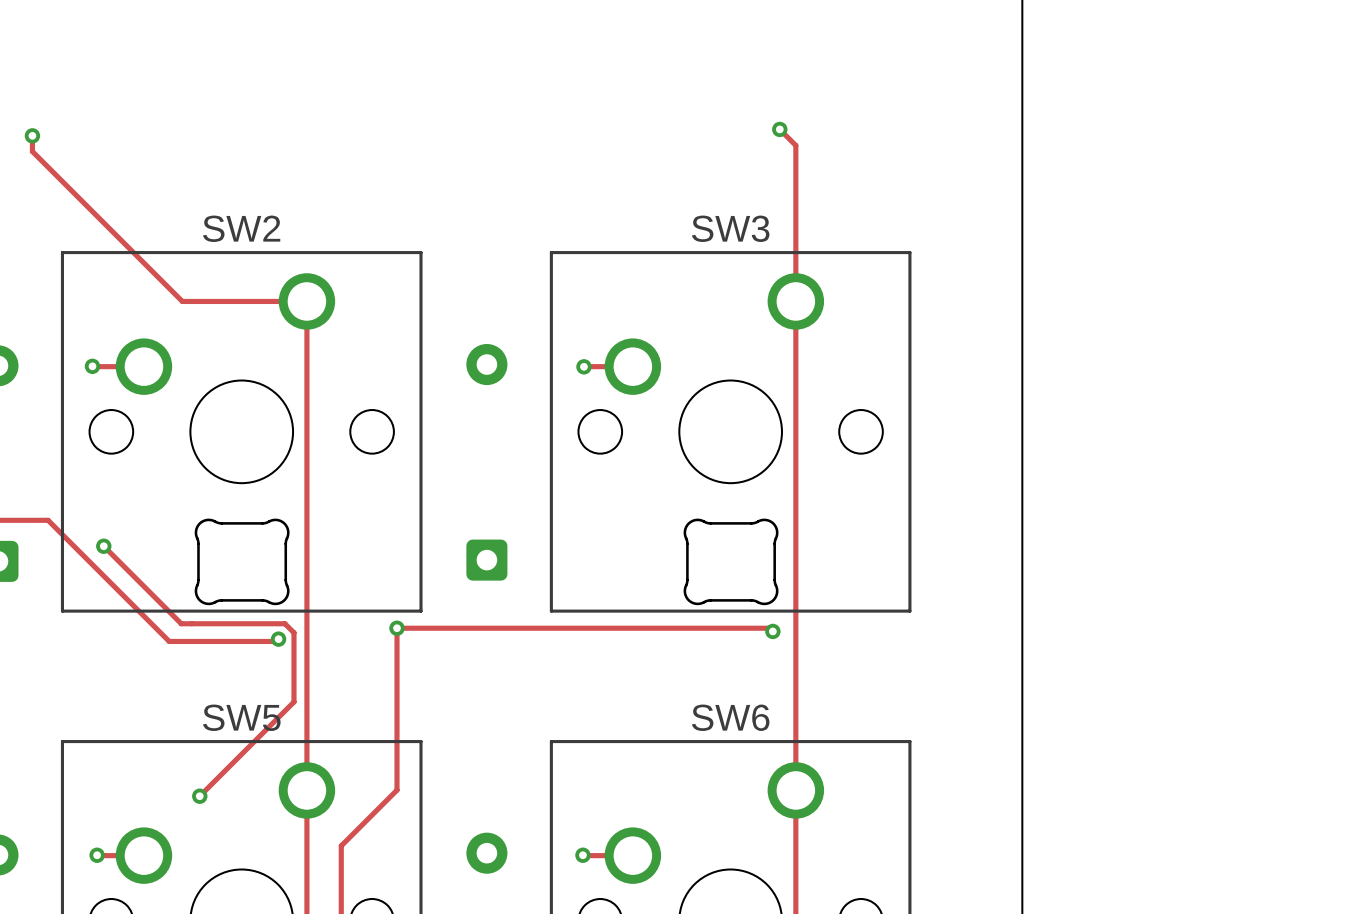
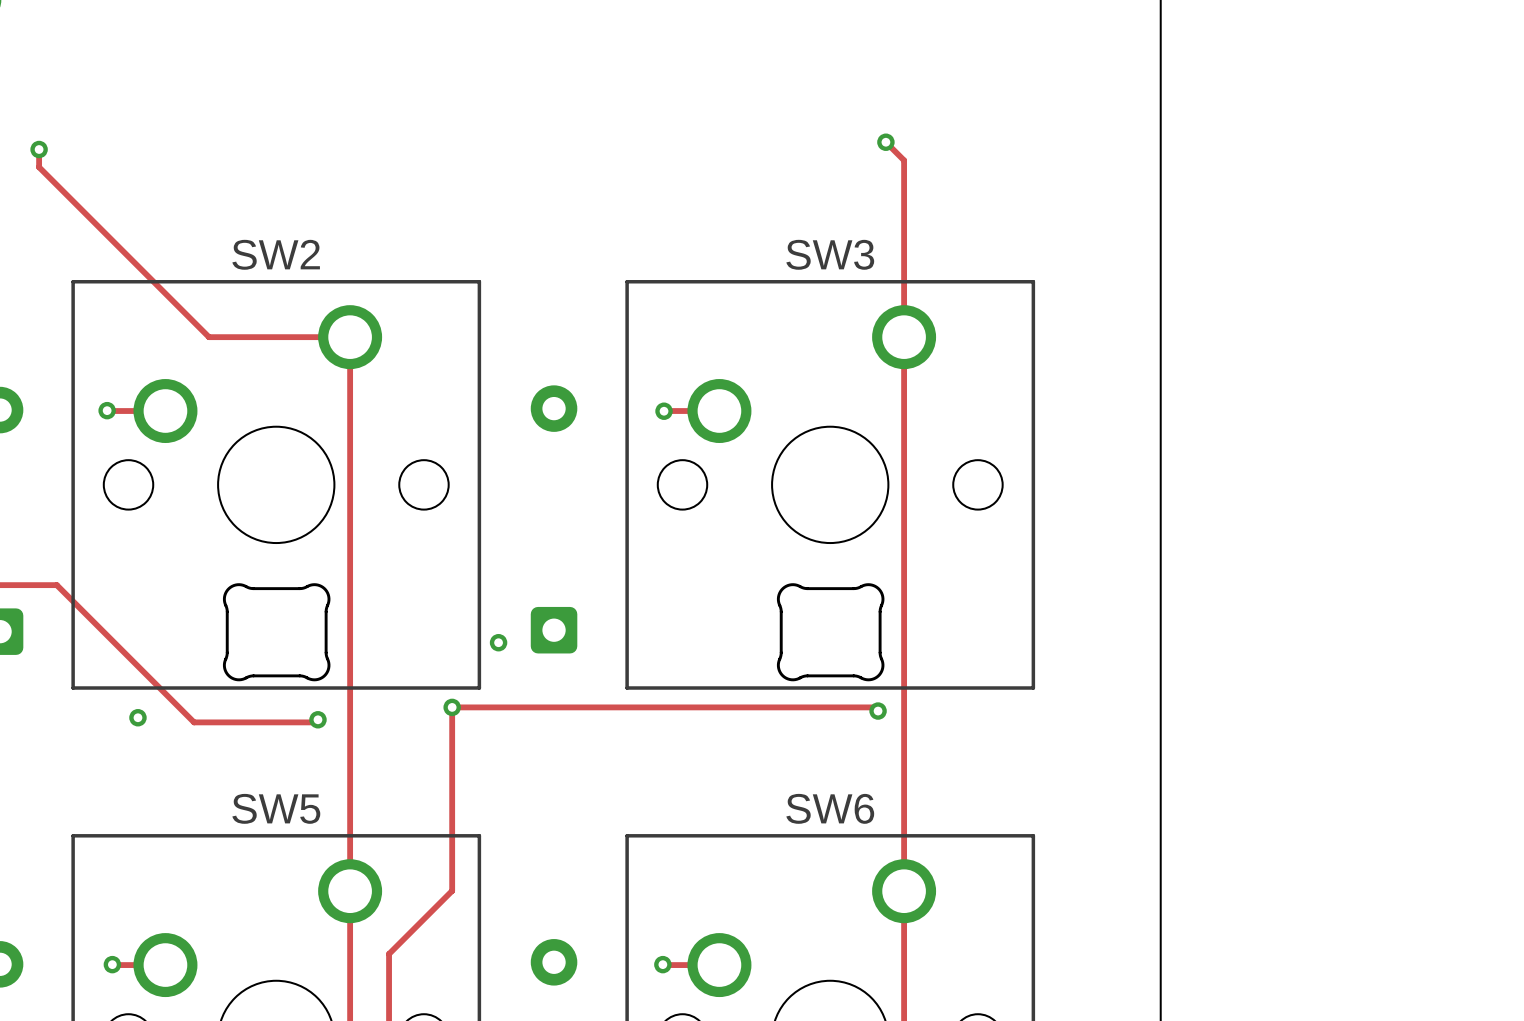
track: (103, 546) (181, 623) (284, 623) (293, 632) (293, 702) (199, 796) -> none
via: (103, 546) -> none
via: none -> (498, 642)
via: none -> (137, 717)
via: (199, 796) -> none

